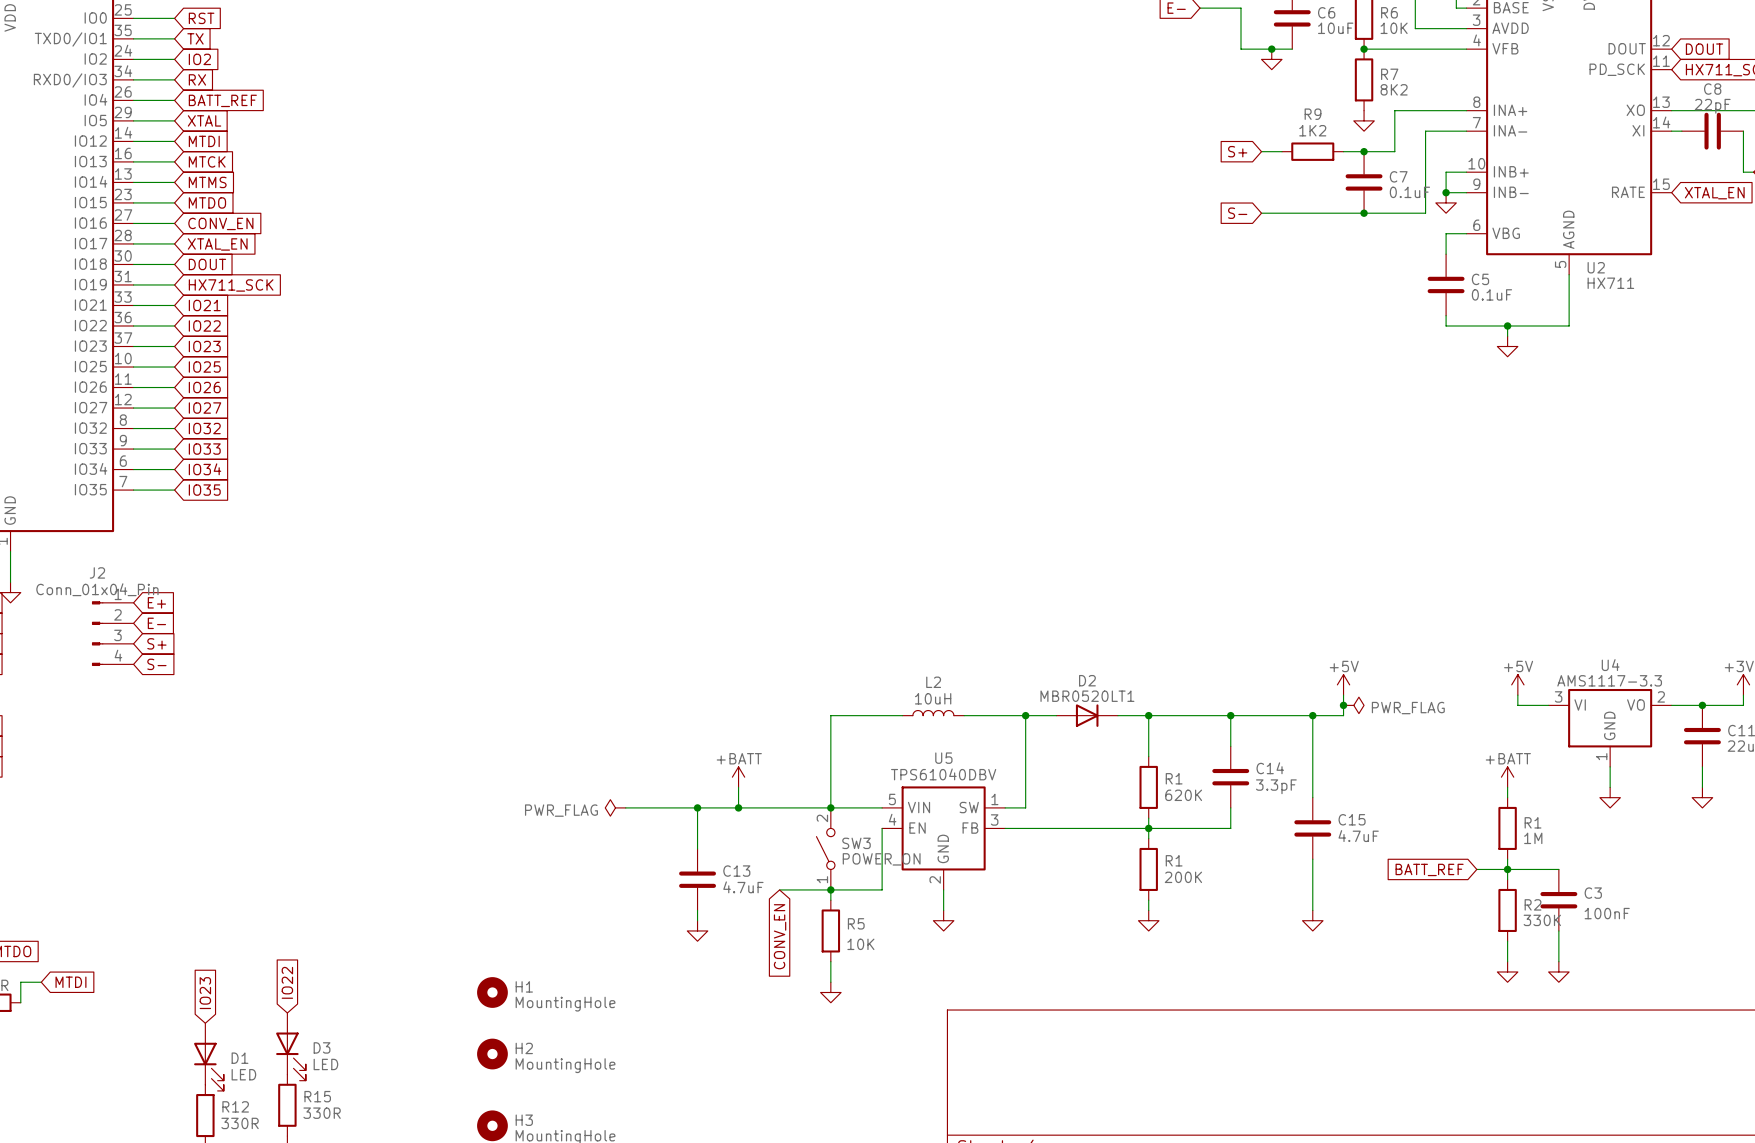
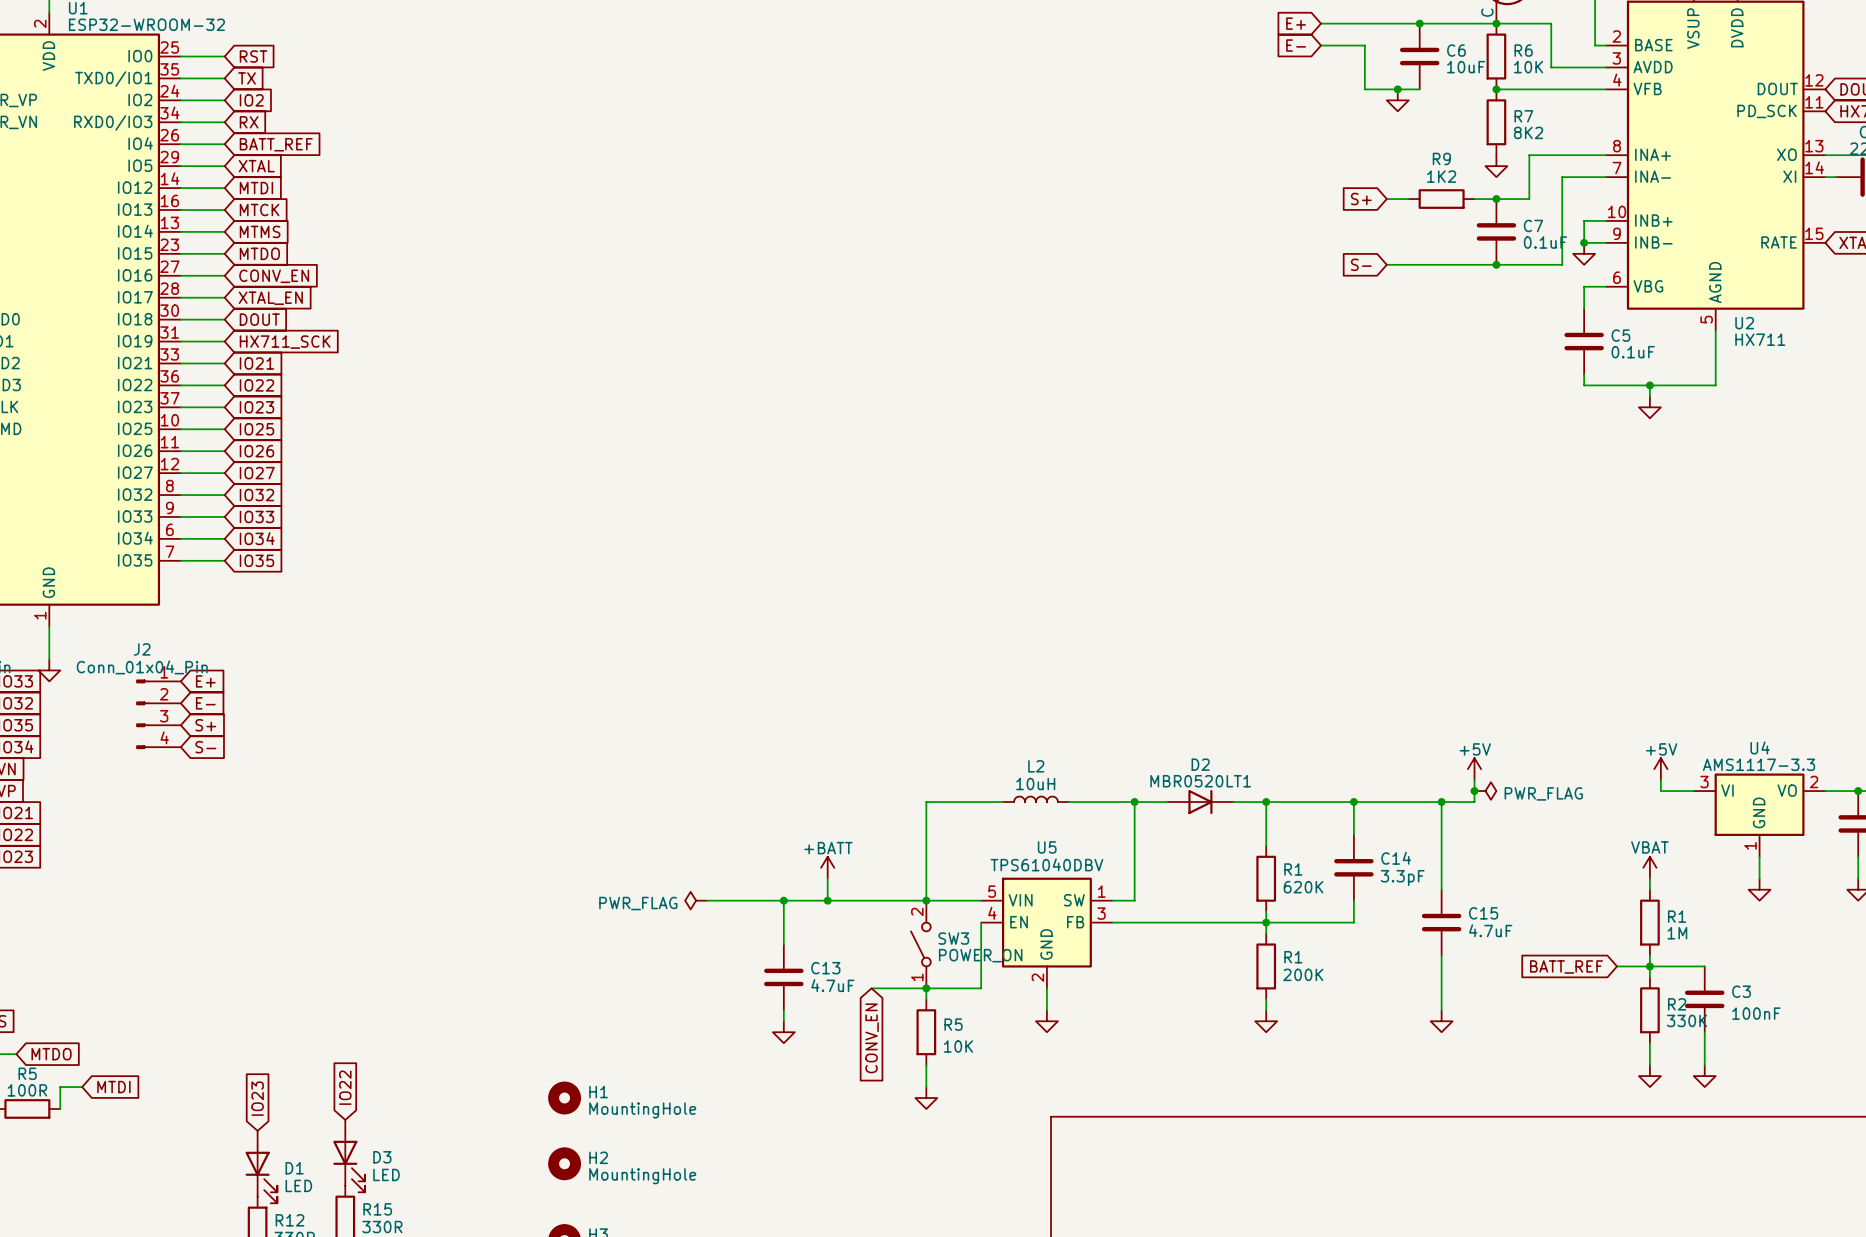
power symbol: +BATT (1507, 777) -> VBAT (1649, 867)

